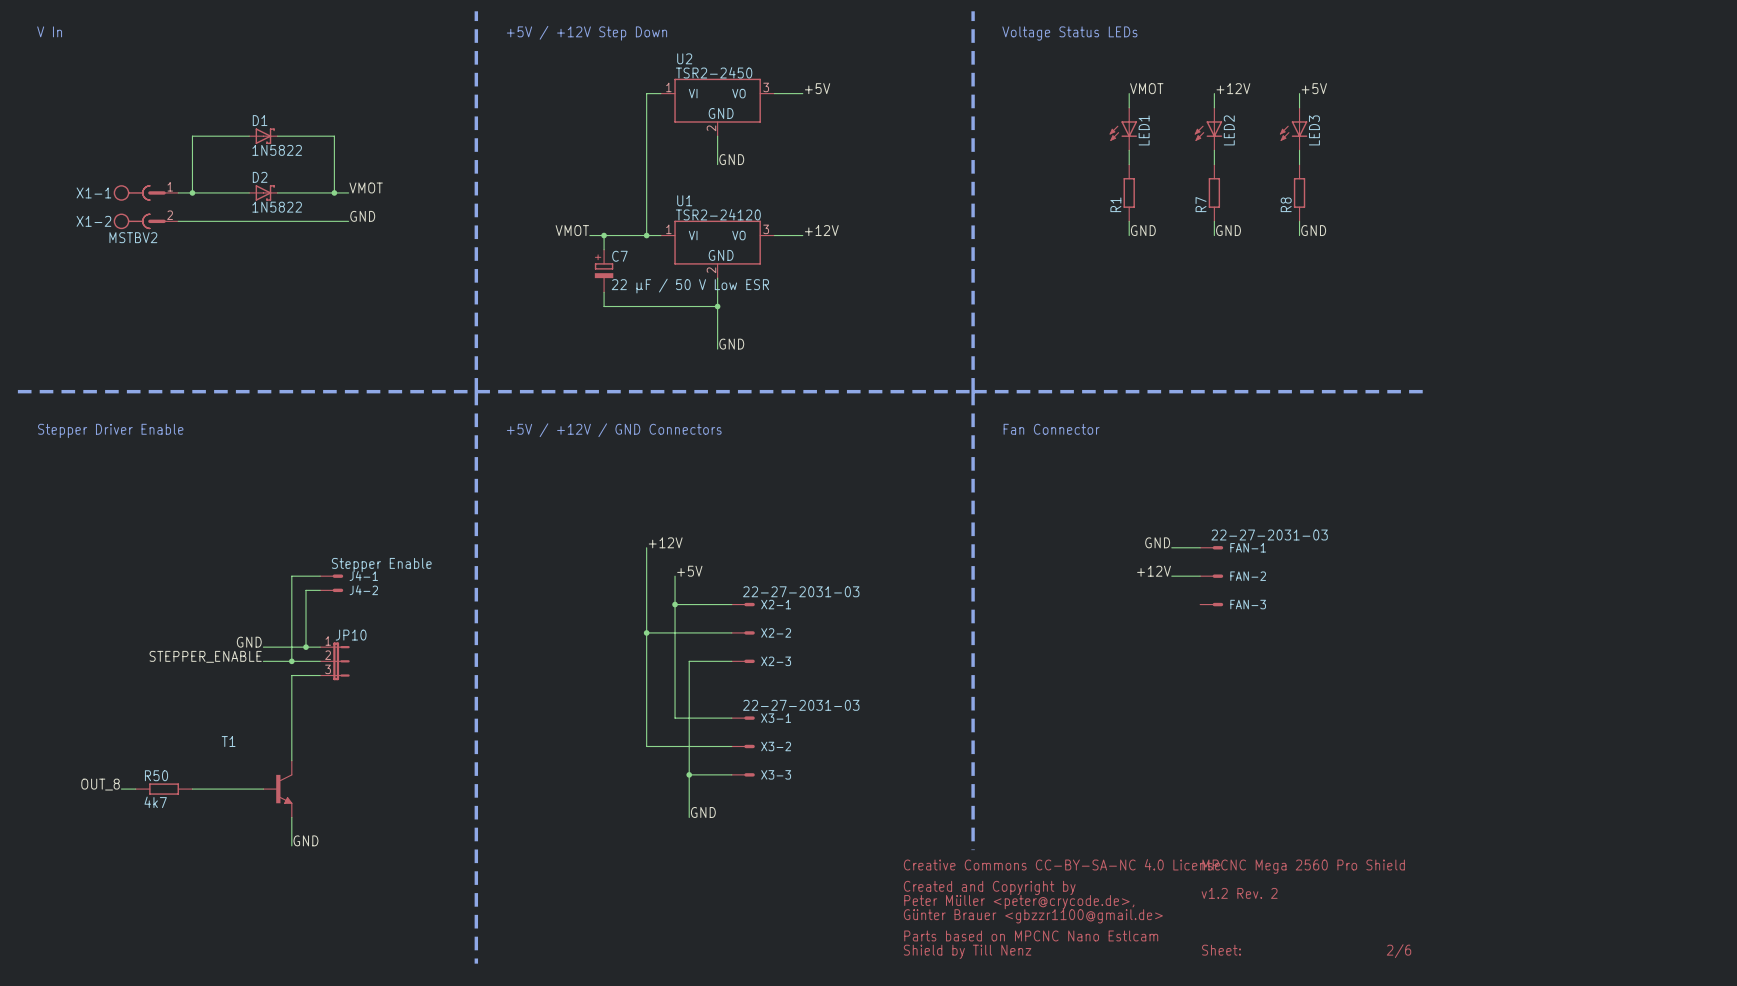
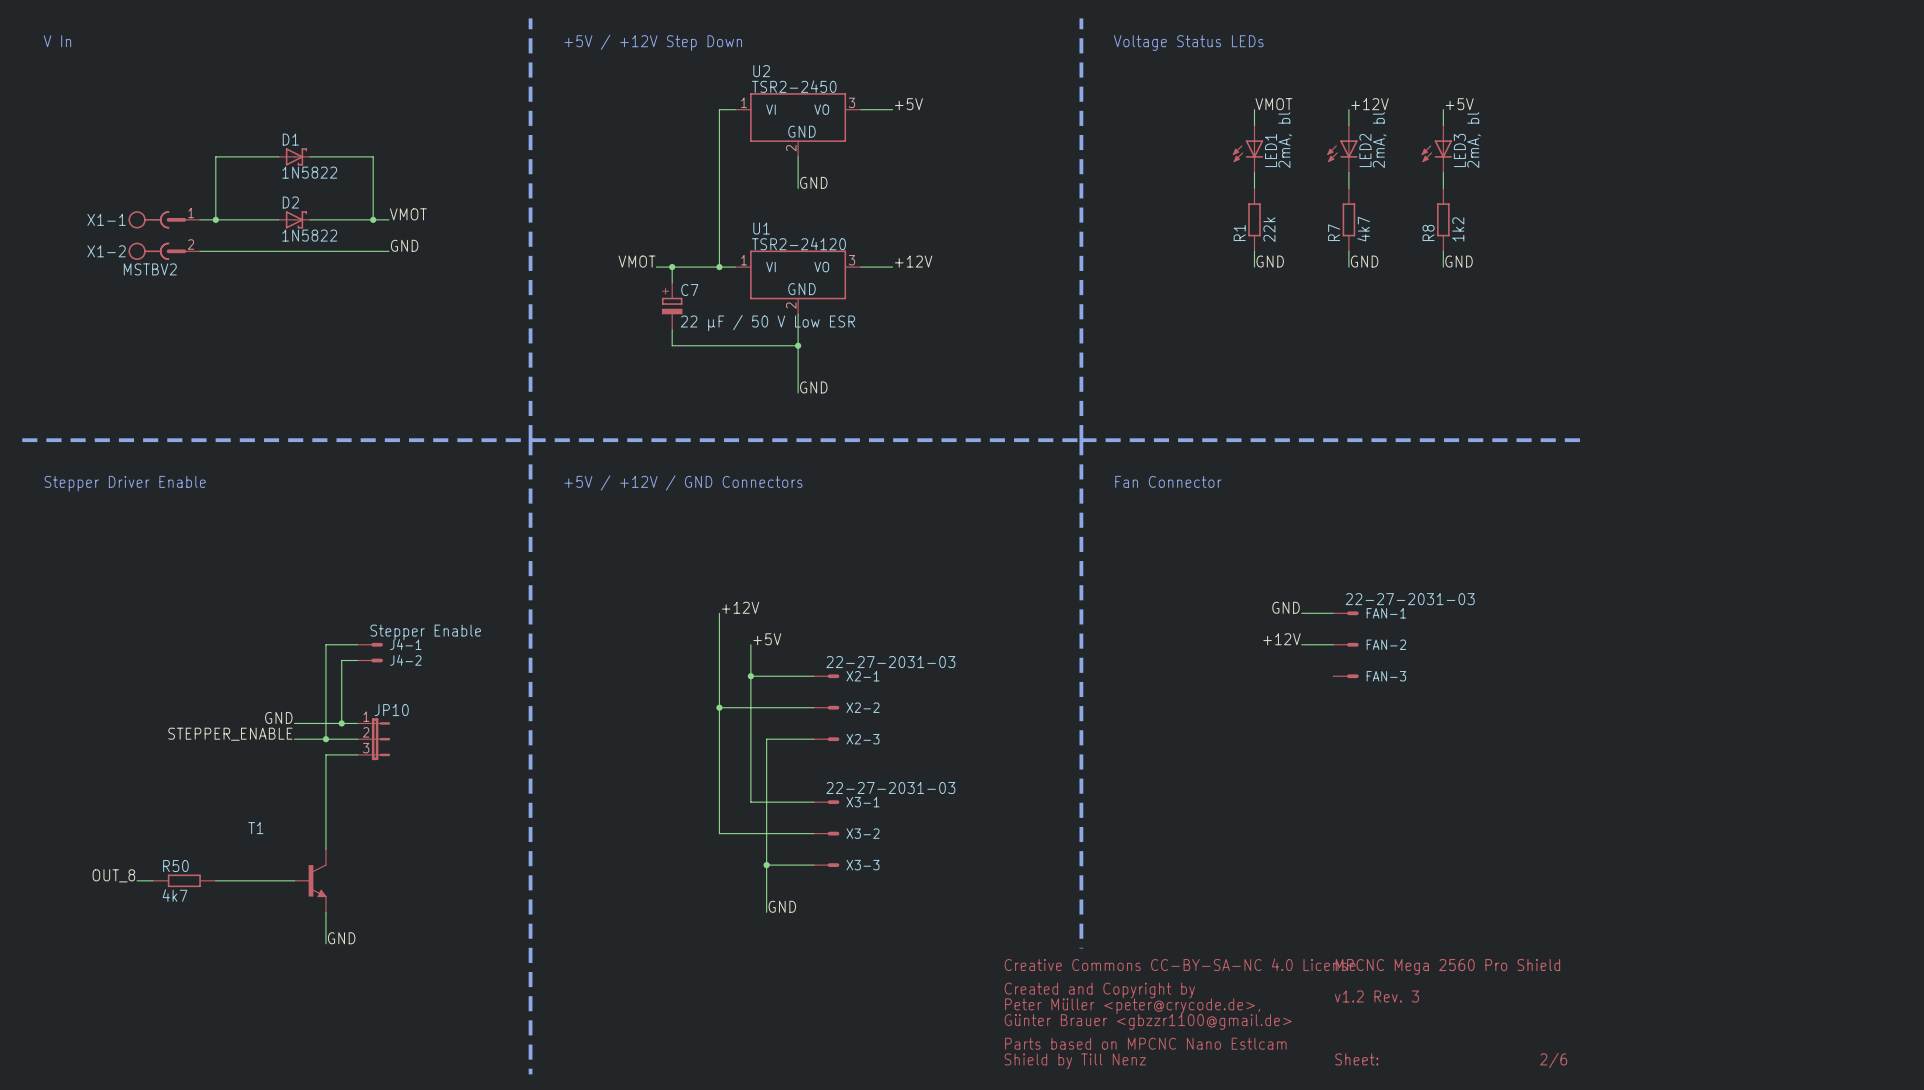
LED1 value: none -> 2mA, bl (1285, 140)
LED2 value: none -> 2mA, bl (1379, 140)
LED3 value: none -> 2mA, bl (1474, 140)
R1 value: none -> 22k (1269, 229)
R7 value: none -> 4k7 (1363, 229)
R8 value: none -> 1k2 (1458, 229)
text: v1.2 Rev. 2 (1239, 893) -> v1.2 Rev. 3 (1376, 996)

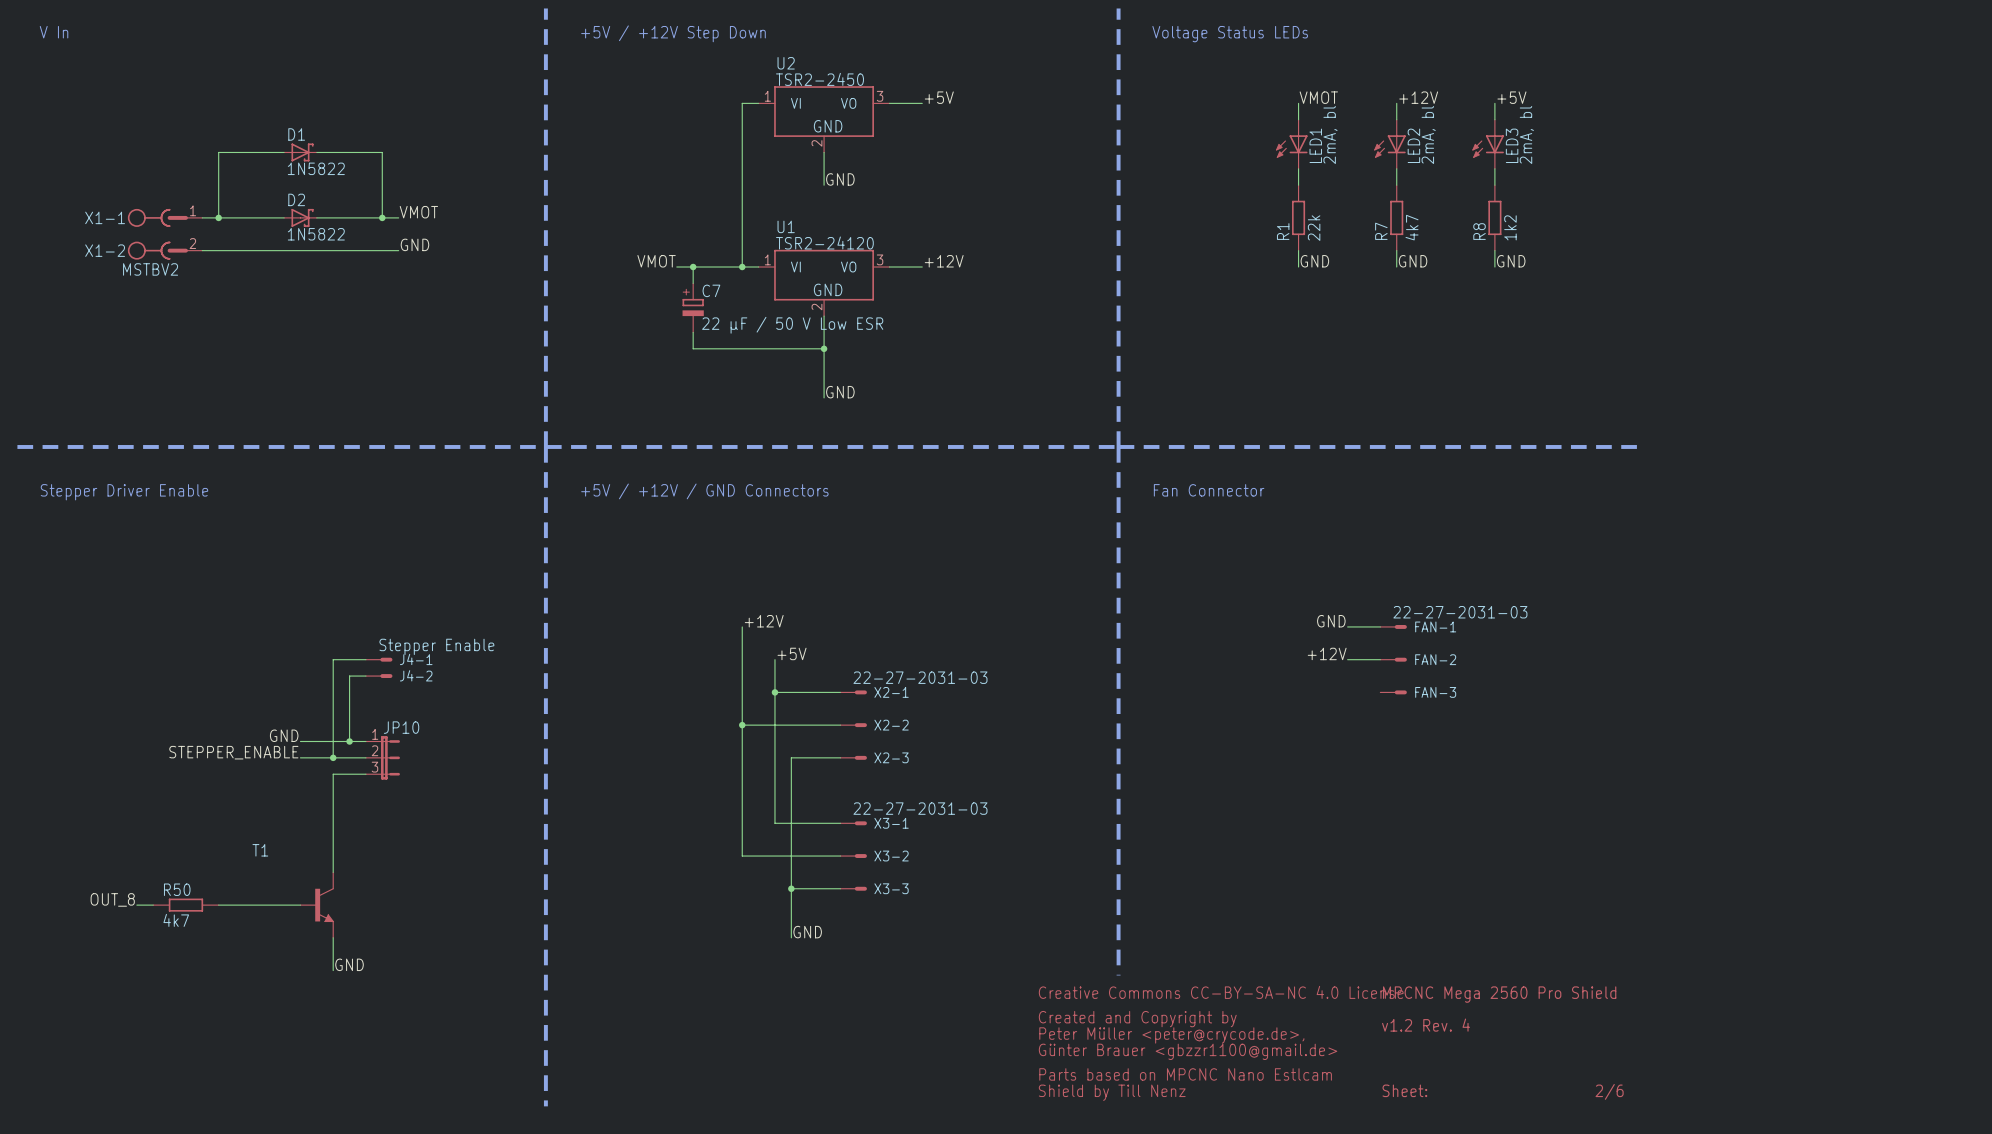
text: v1.2 Rev. 3 (1376, 996) -> v1.2 Rev. 4 (1426, 1025)

